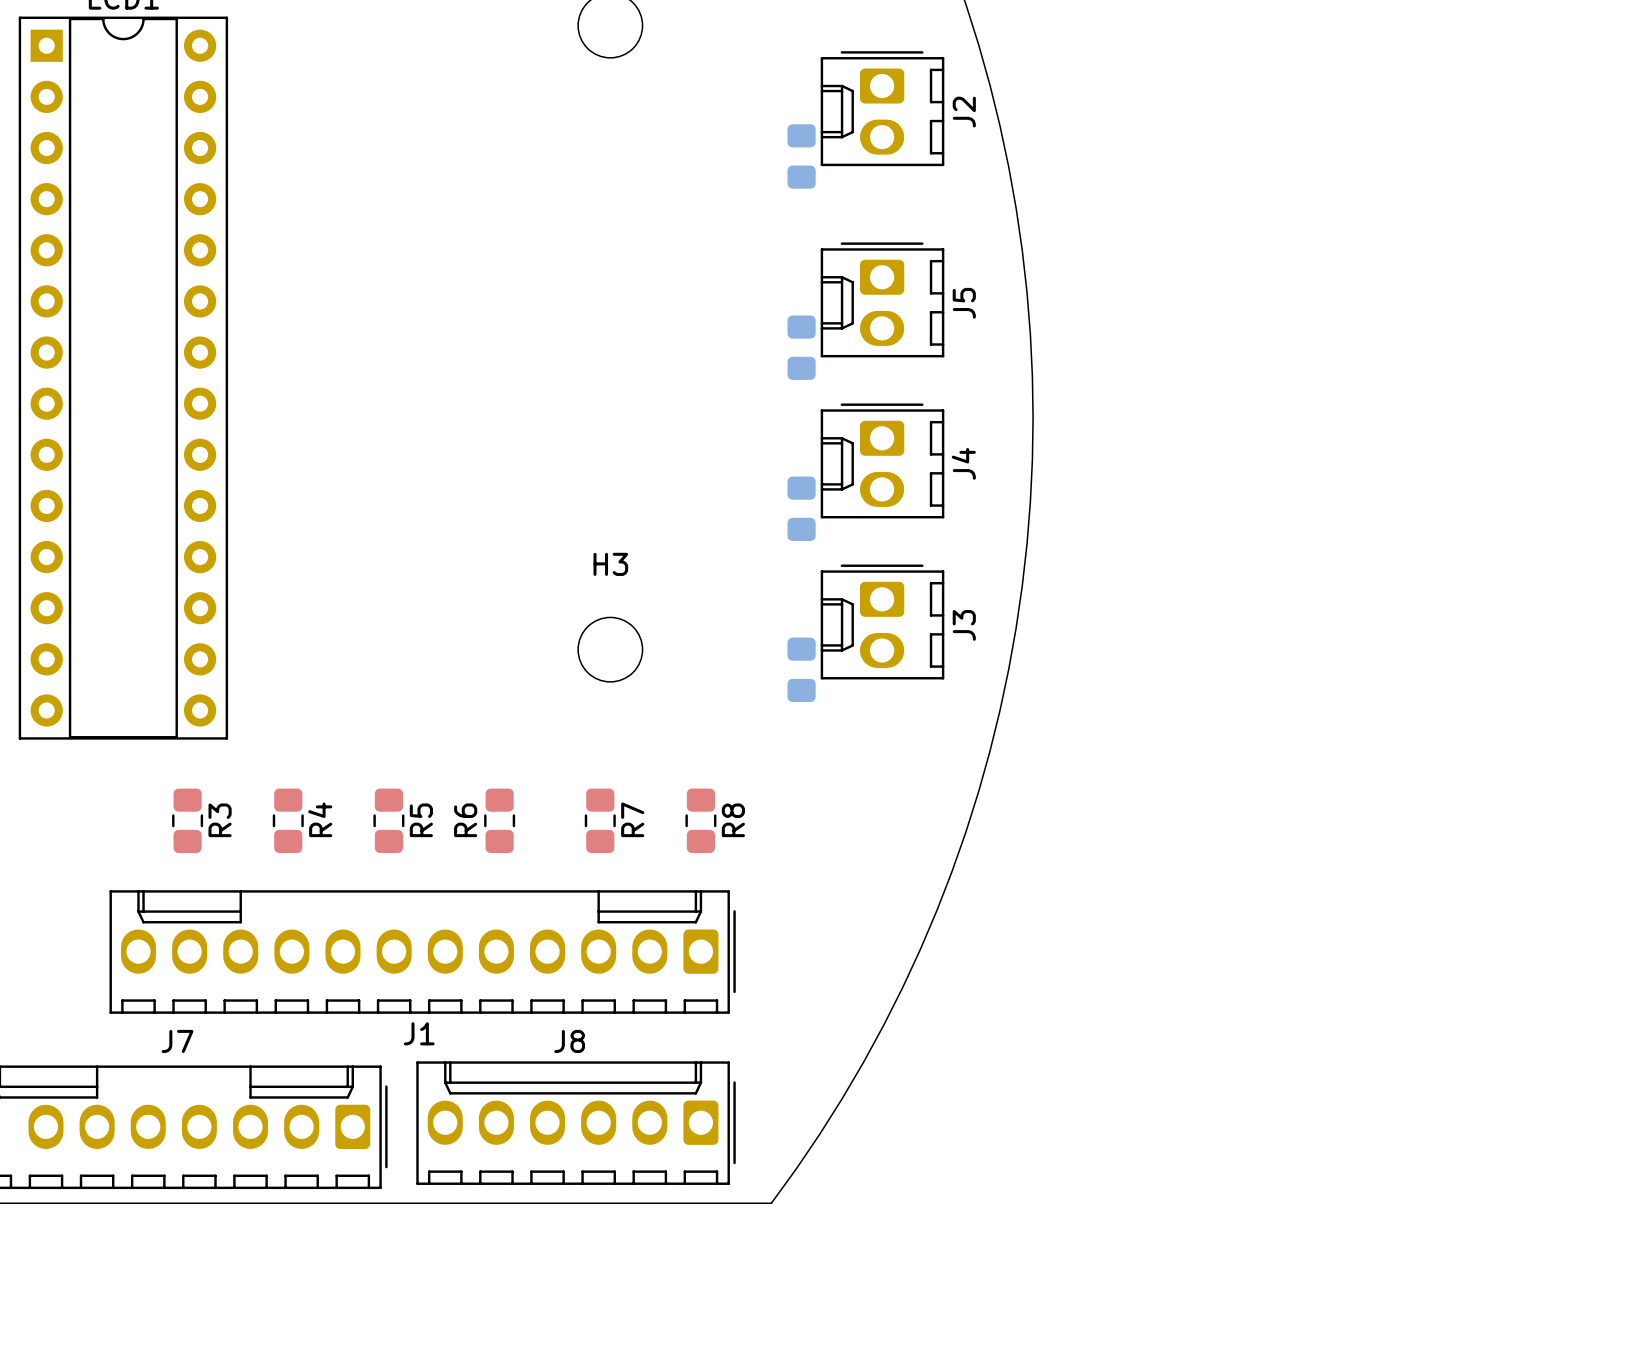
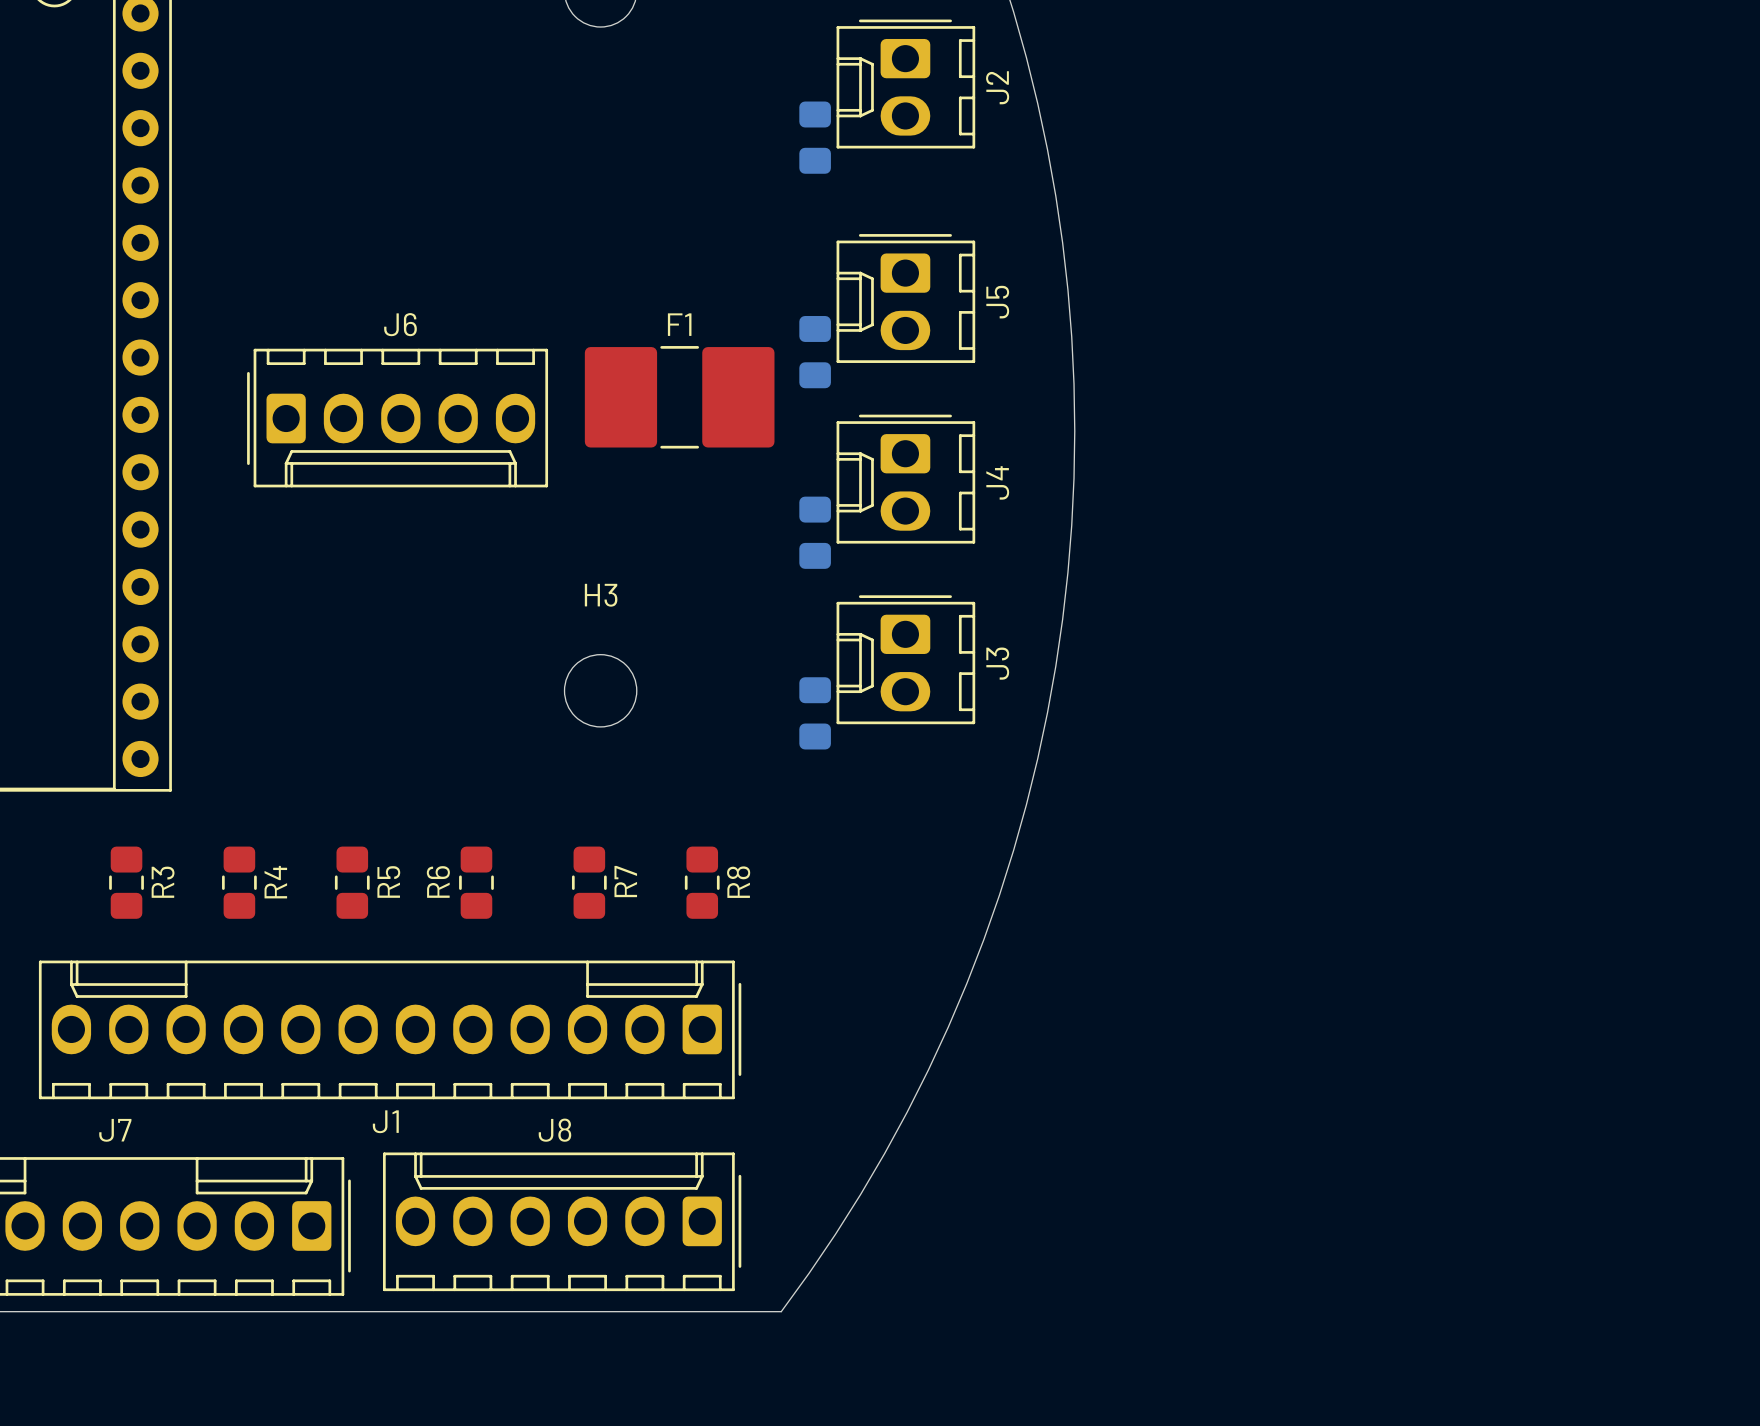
F1: none -> (679, 397)
J6: none -> (397, 418)

